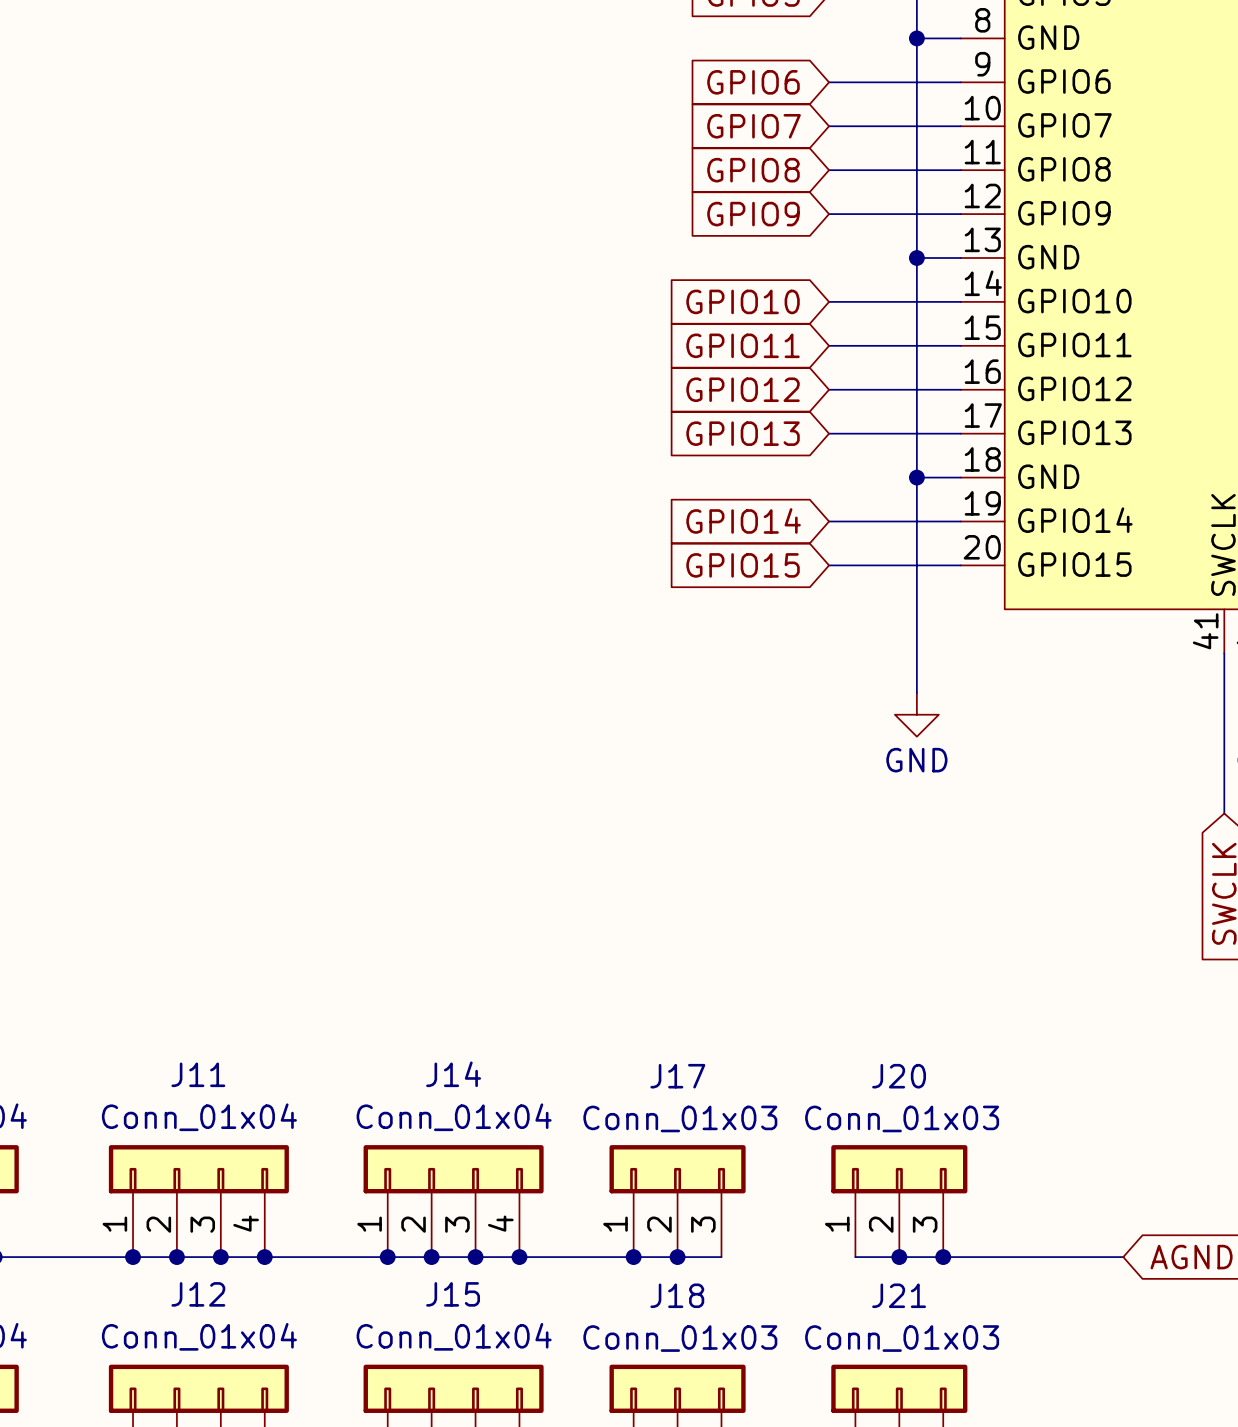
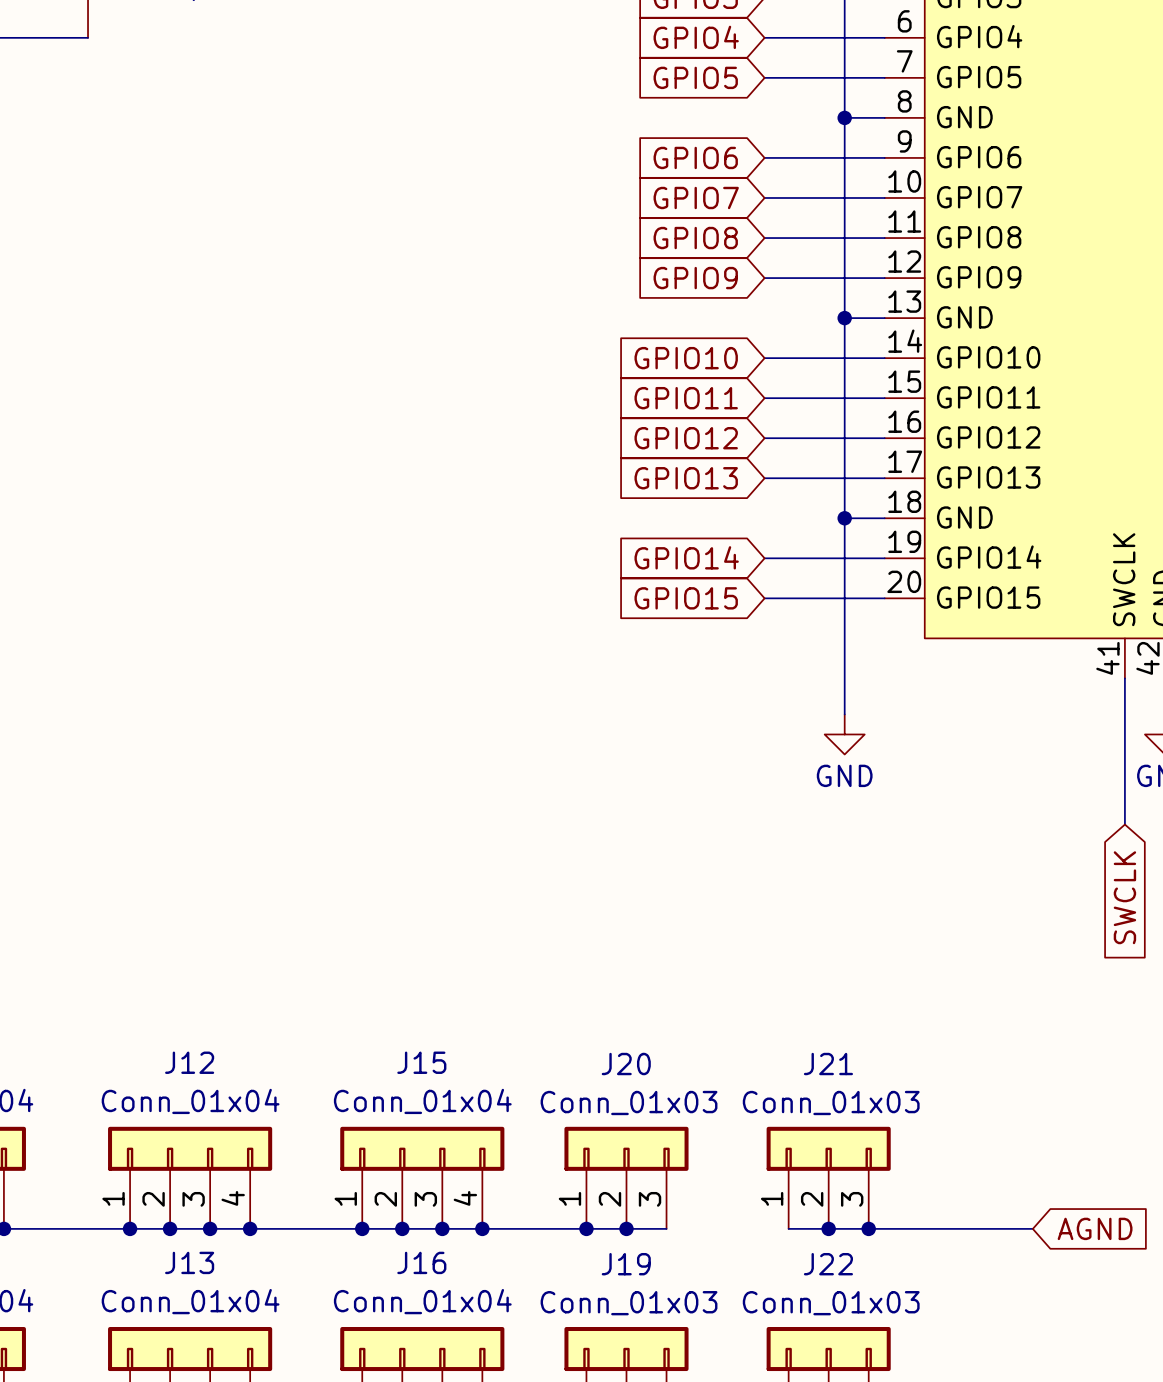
J11 name: J11 (198, 1074) -> J12 (189, 1062)
J14 name: J14 (453, 1074) -> J15 (421, 1062)
J17 name: J17 (677, 1076) -> J20 (626, 1064)
J20 name: J20 (899, 1076) -> J21 (828, 1064)
J12 name: J12 (198, 1294) -> J13 (189, 1262)
J15 name: J15 (453, 1294) -> J16 (421, 1262)
J18 name: J18 (677, 1295) -> J19 (626, 1264)
J21 name: J21 (899, 1295) -> J22 (828, 1264)

